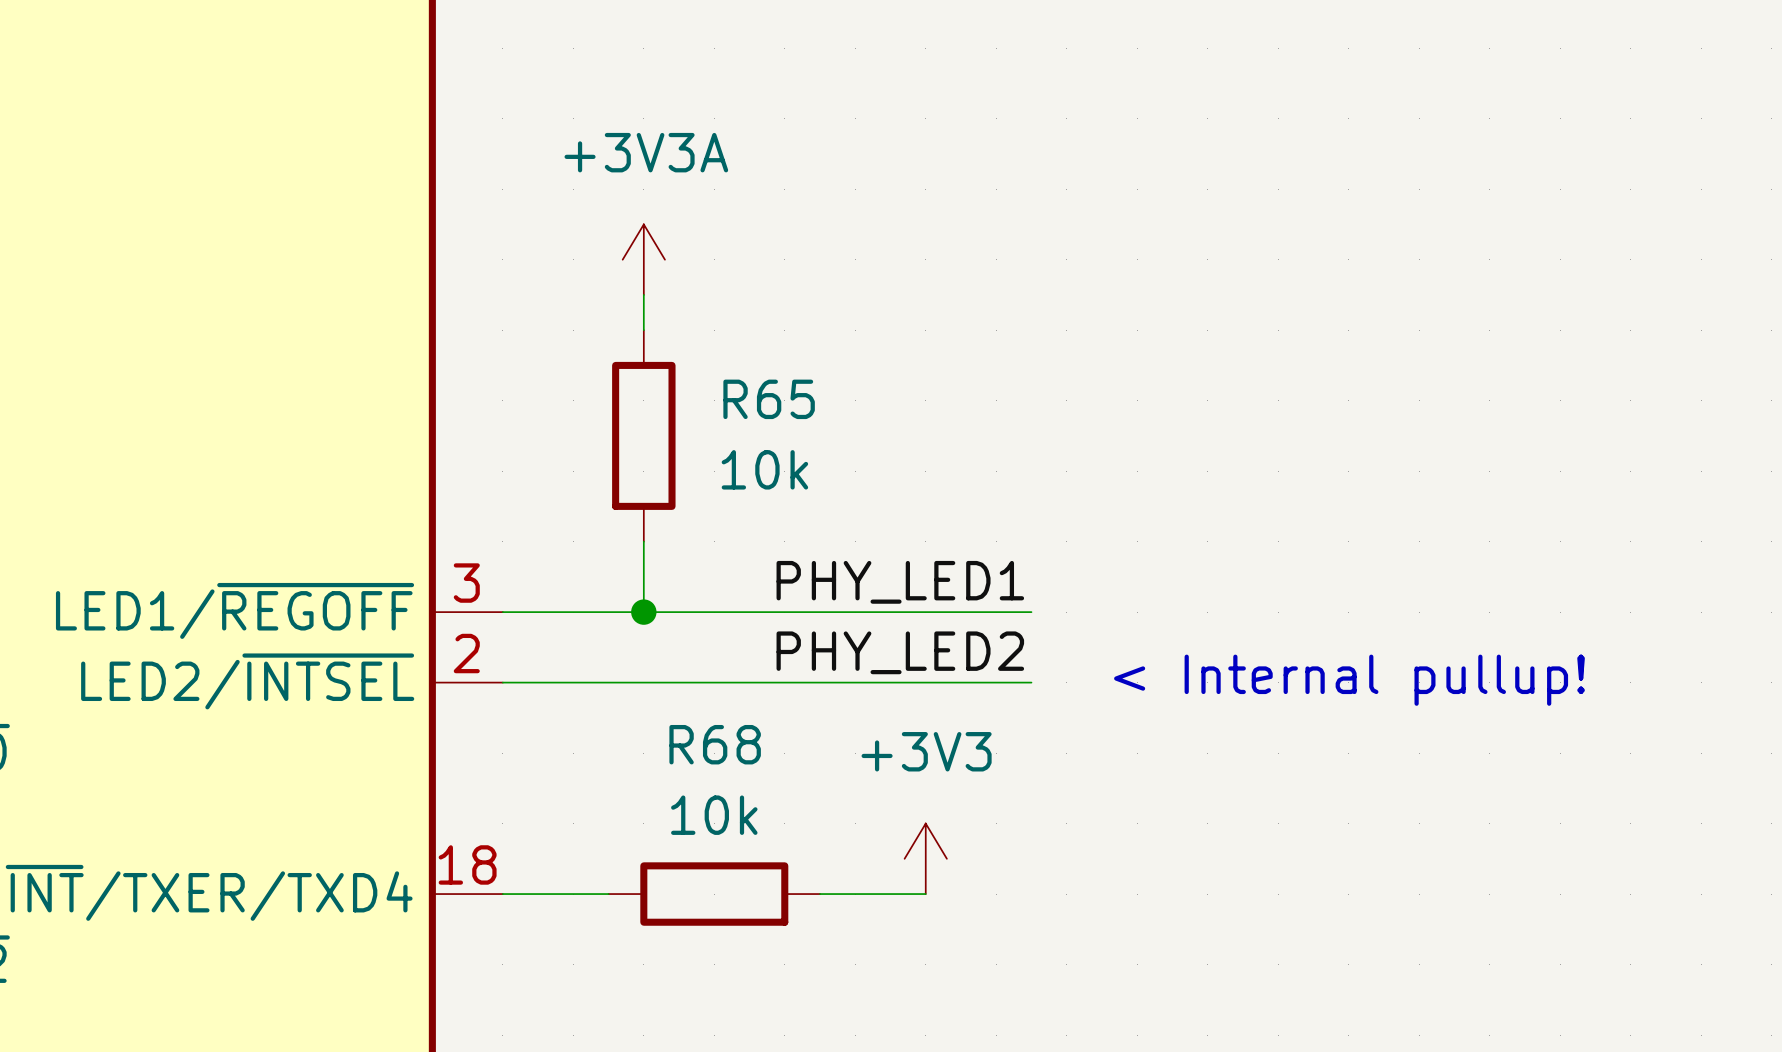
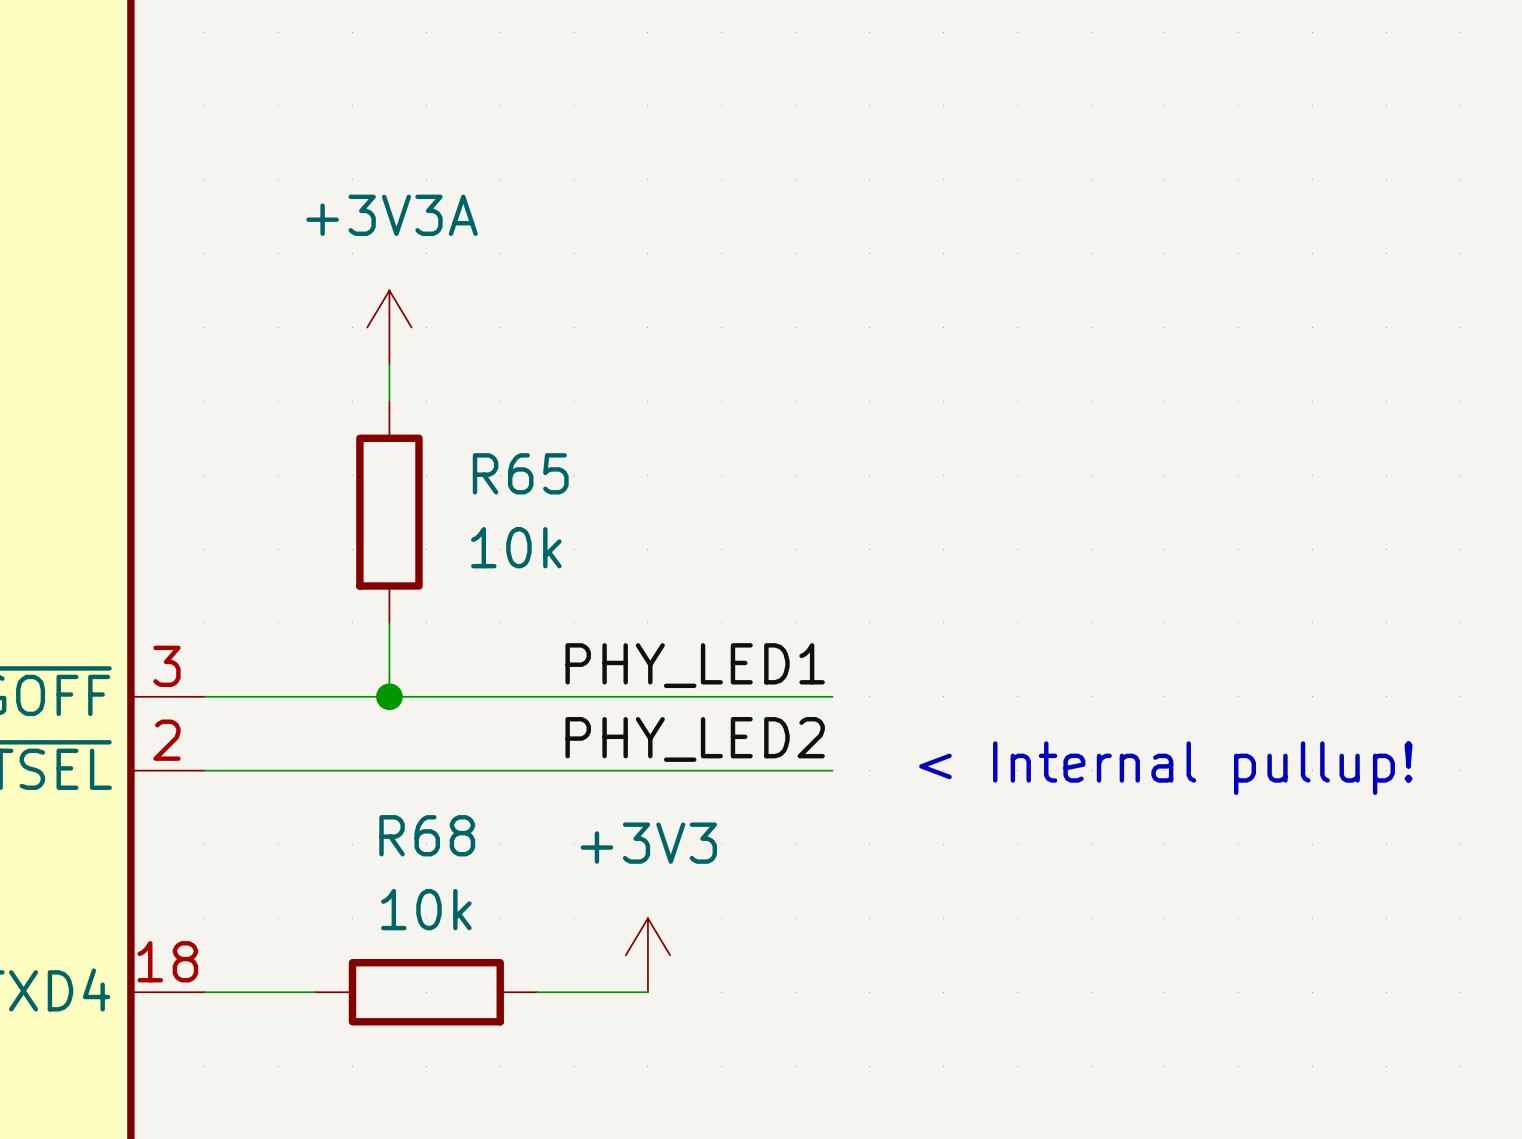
power symbol position: +3V3A (643, 259) -> +3V3A (389, 327)
wire: (643, 294) (643, 330) -> (389, 364) (389, 401)
R65 position: (643, 435) -> (389, 512)
wire: (643, 541) (643, 612) -> (389, 622) (389, 696)
label position: PHY_LED1 (900, 582) -> PHY_LED1 (695, 665)
junction position: (643, 612) -> (389, 696)
wire: none -> (758, 696) (832, 696)
label position: PHY_LED2 (900, 652) -> PHY_LED2 (695, 739)
text position: < Internal pullup! (1349, 680) -> < Internal pullup! (1165, 768)
wire: none -> (758, 770) (832, 770)

